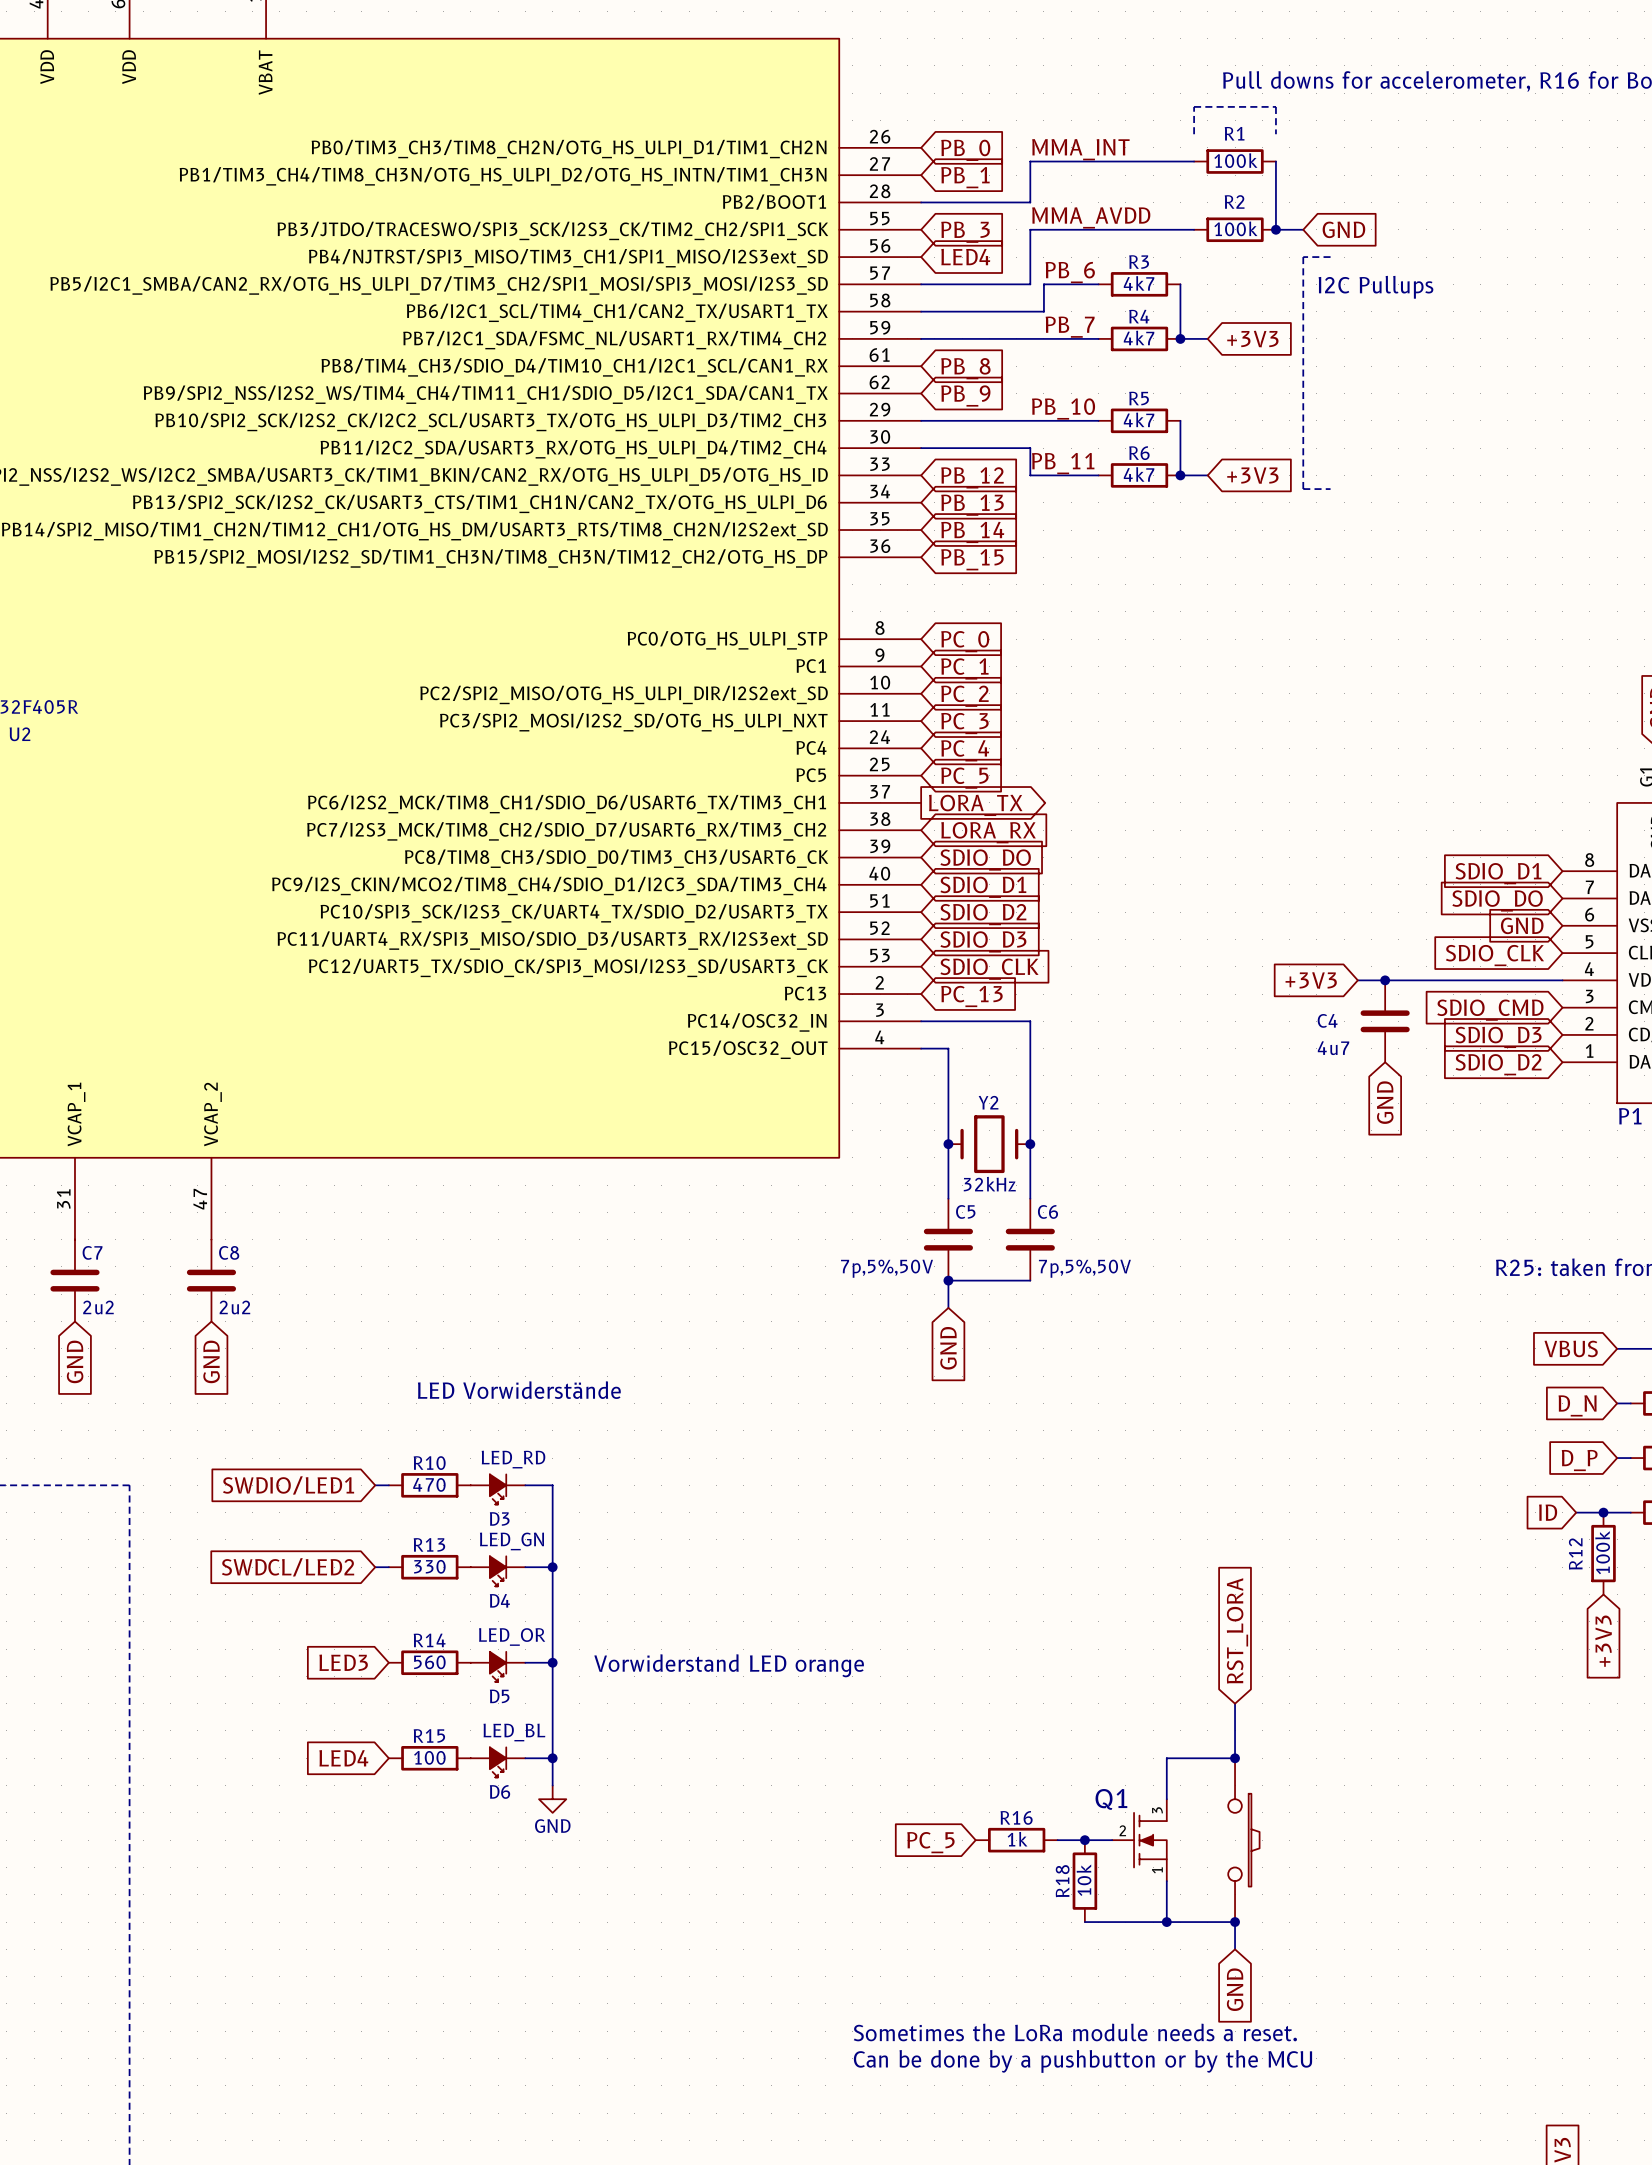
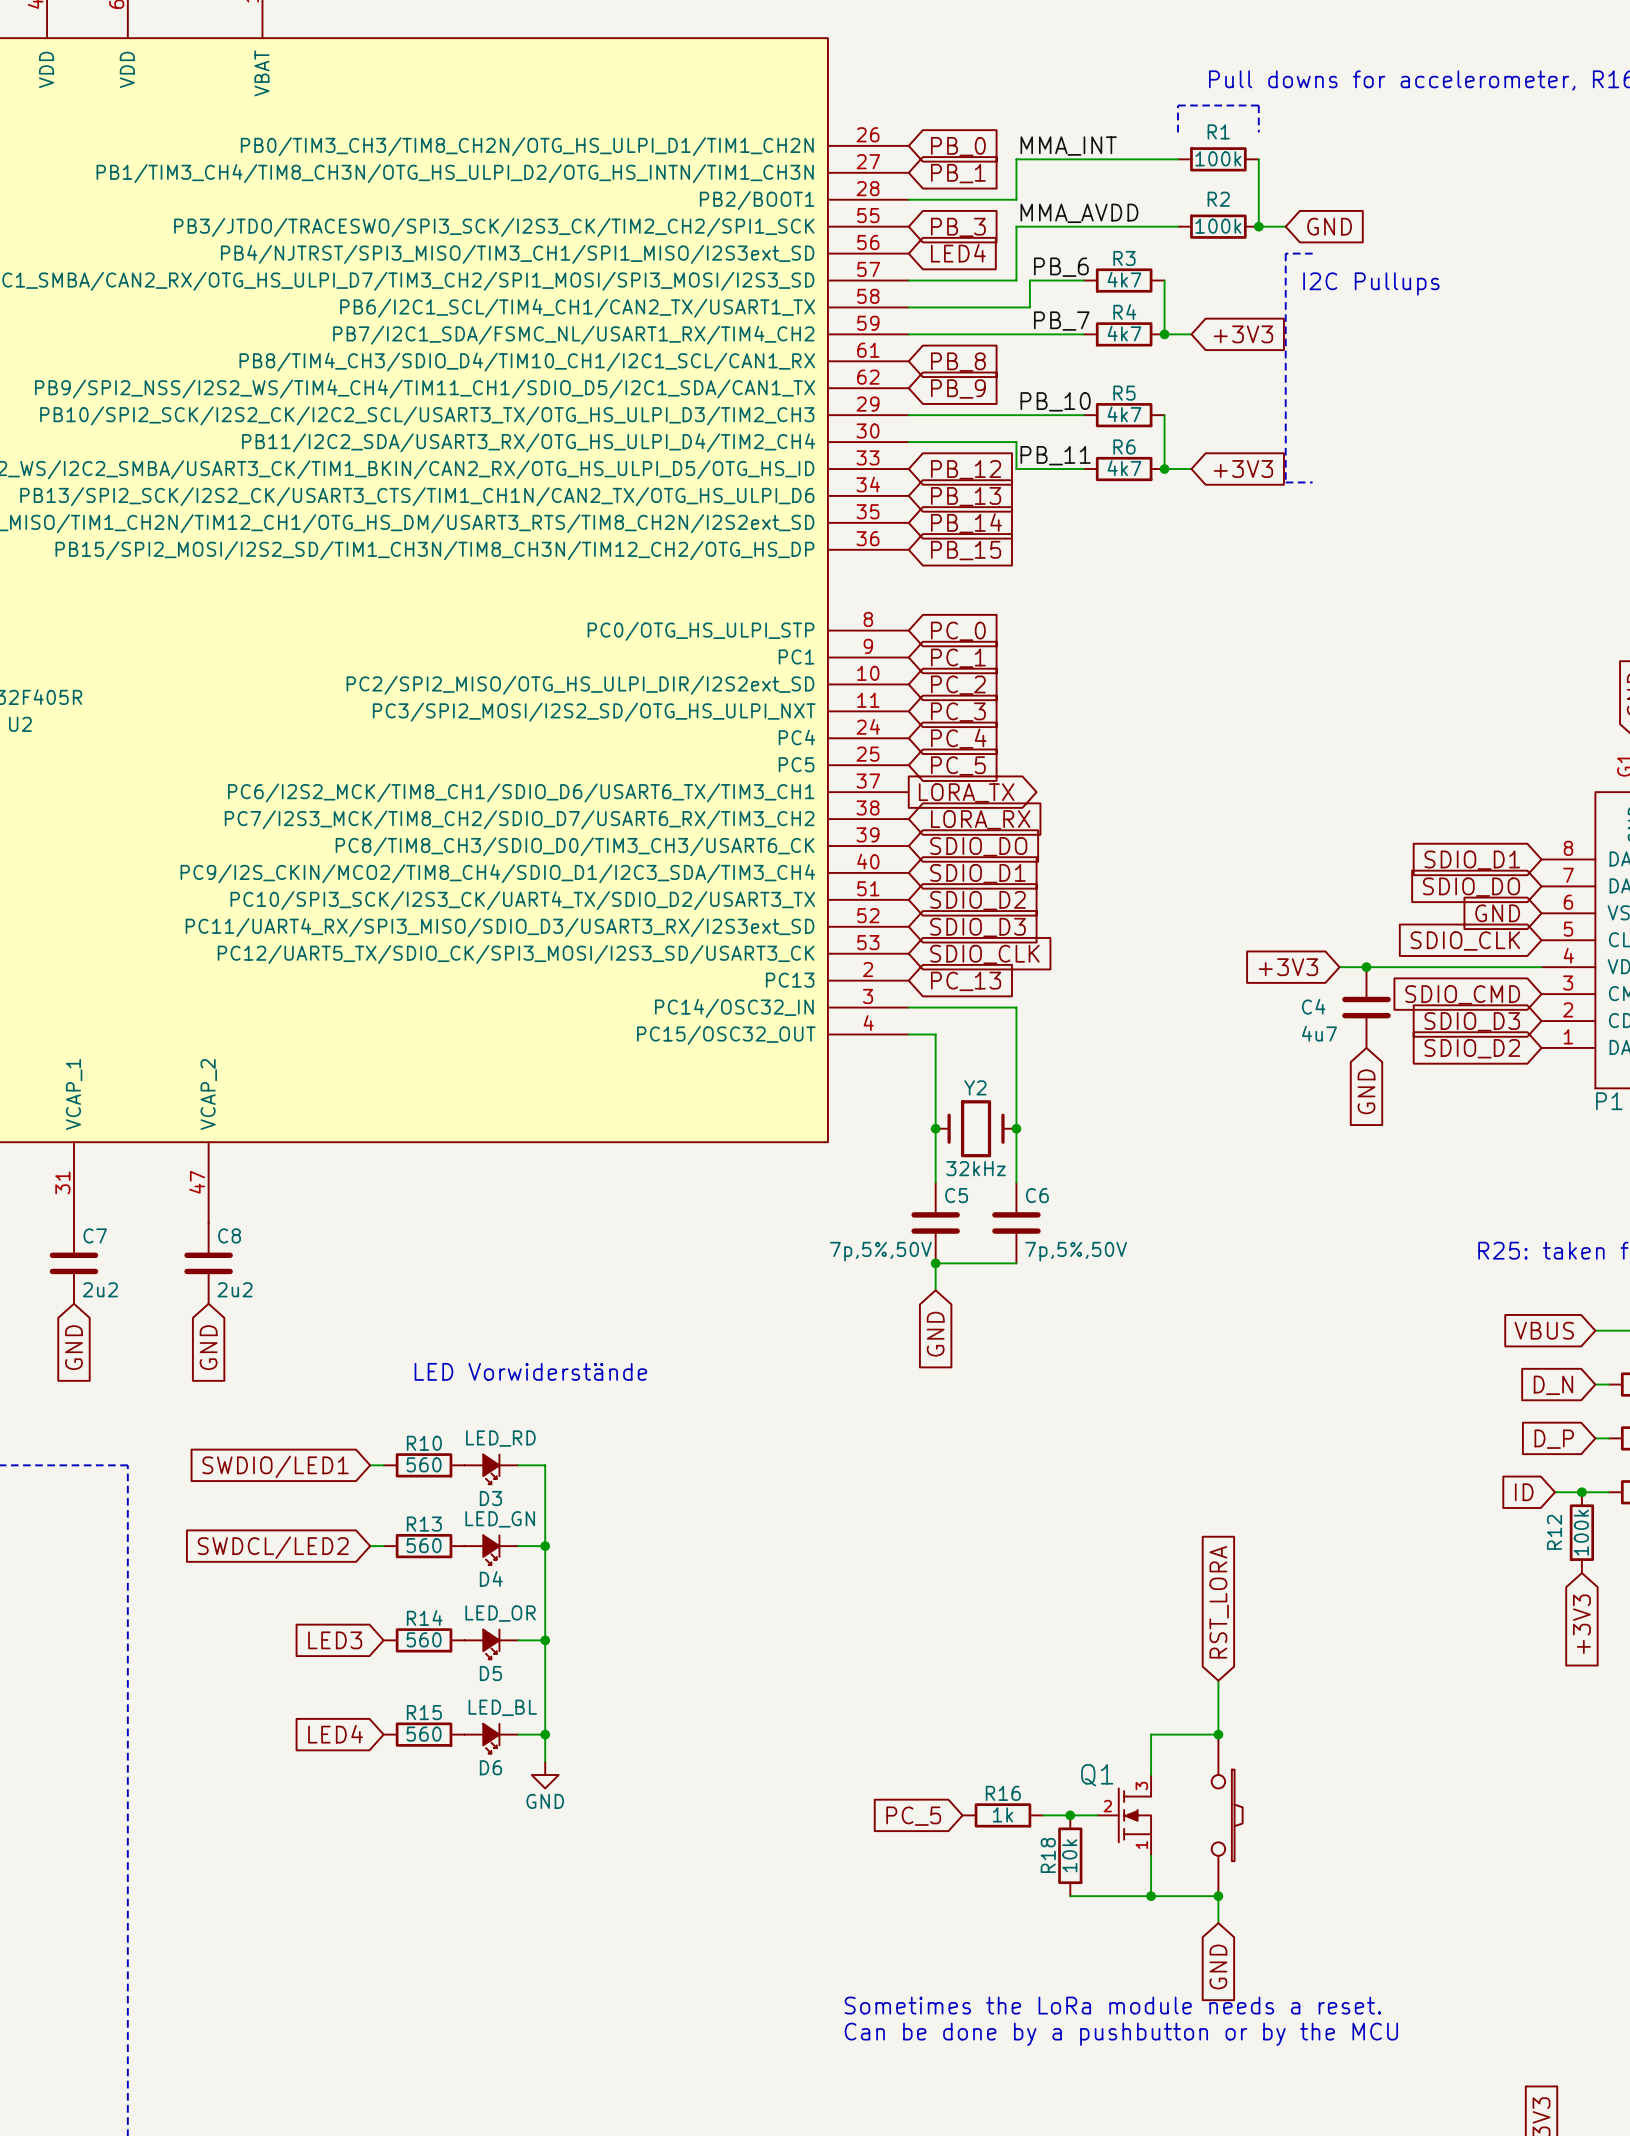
R10 value: 470 (429, 1484) -> 560 (424, 1464)
R13 value: 330 (429, 1566) -> 560 (424, 1545)
text: Vorwiderstand LED orange (729, 1665) -> none
R15 value: 100 (429, 1757) -> 560 (424, 1734)

